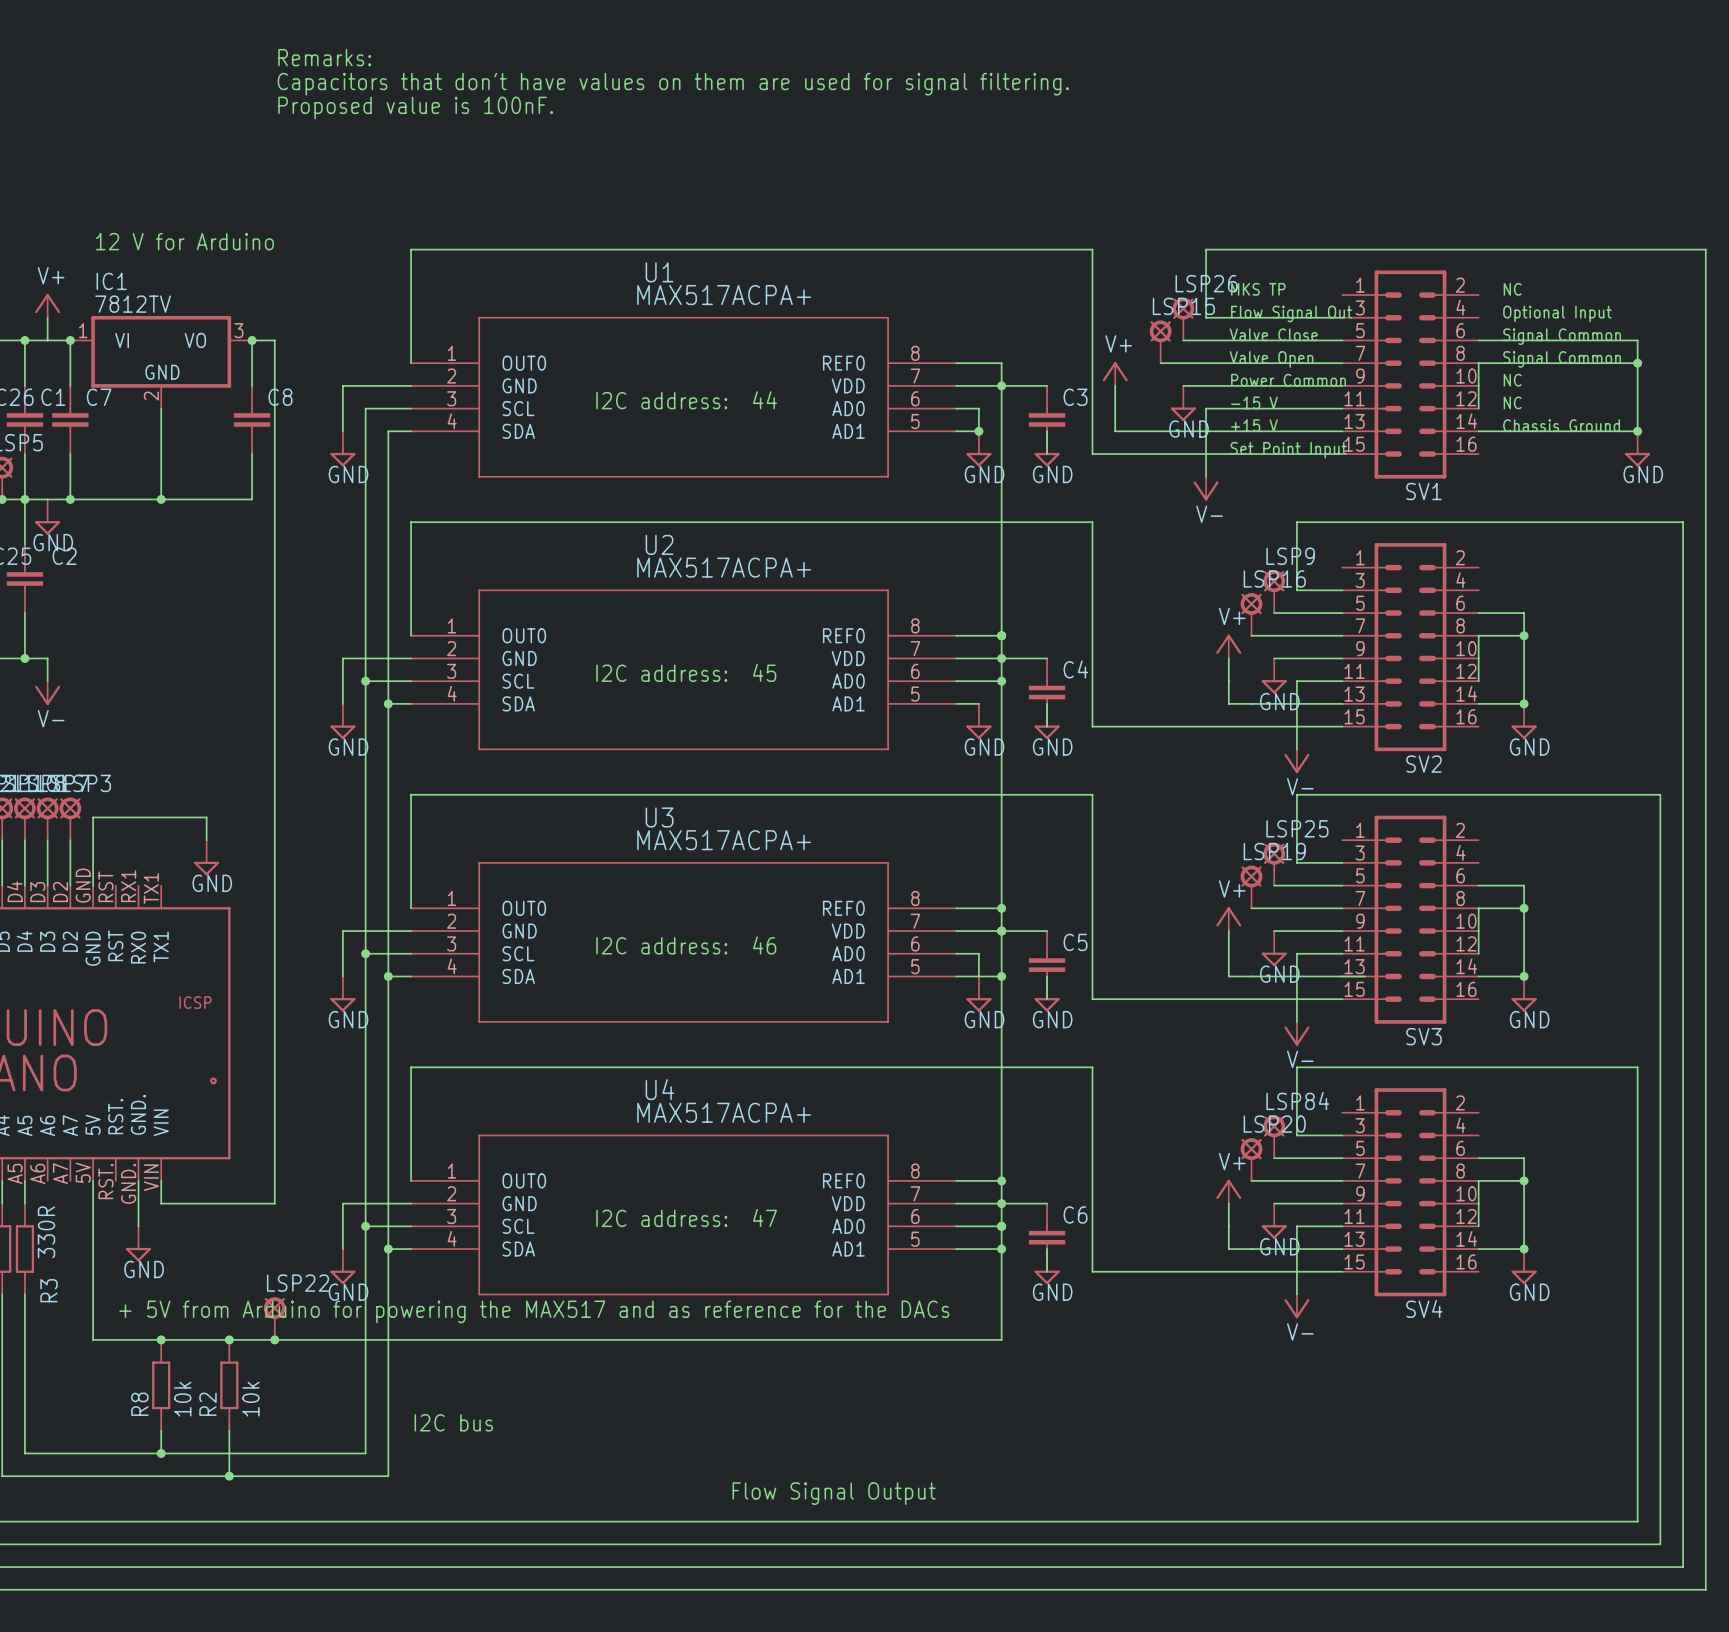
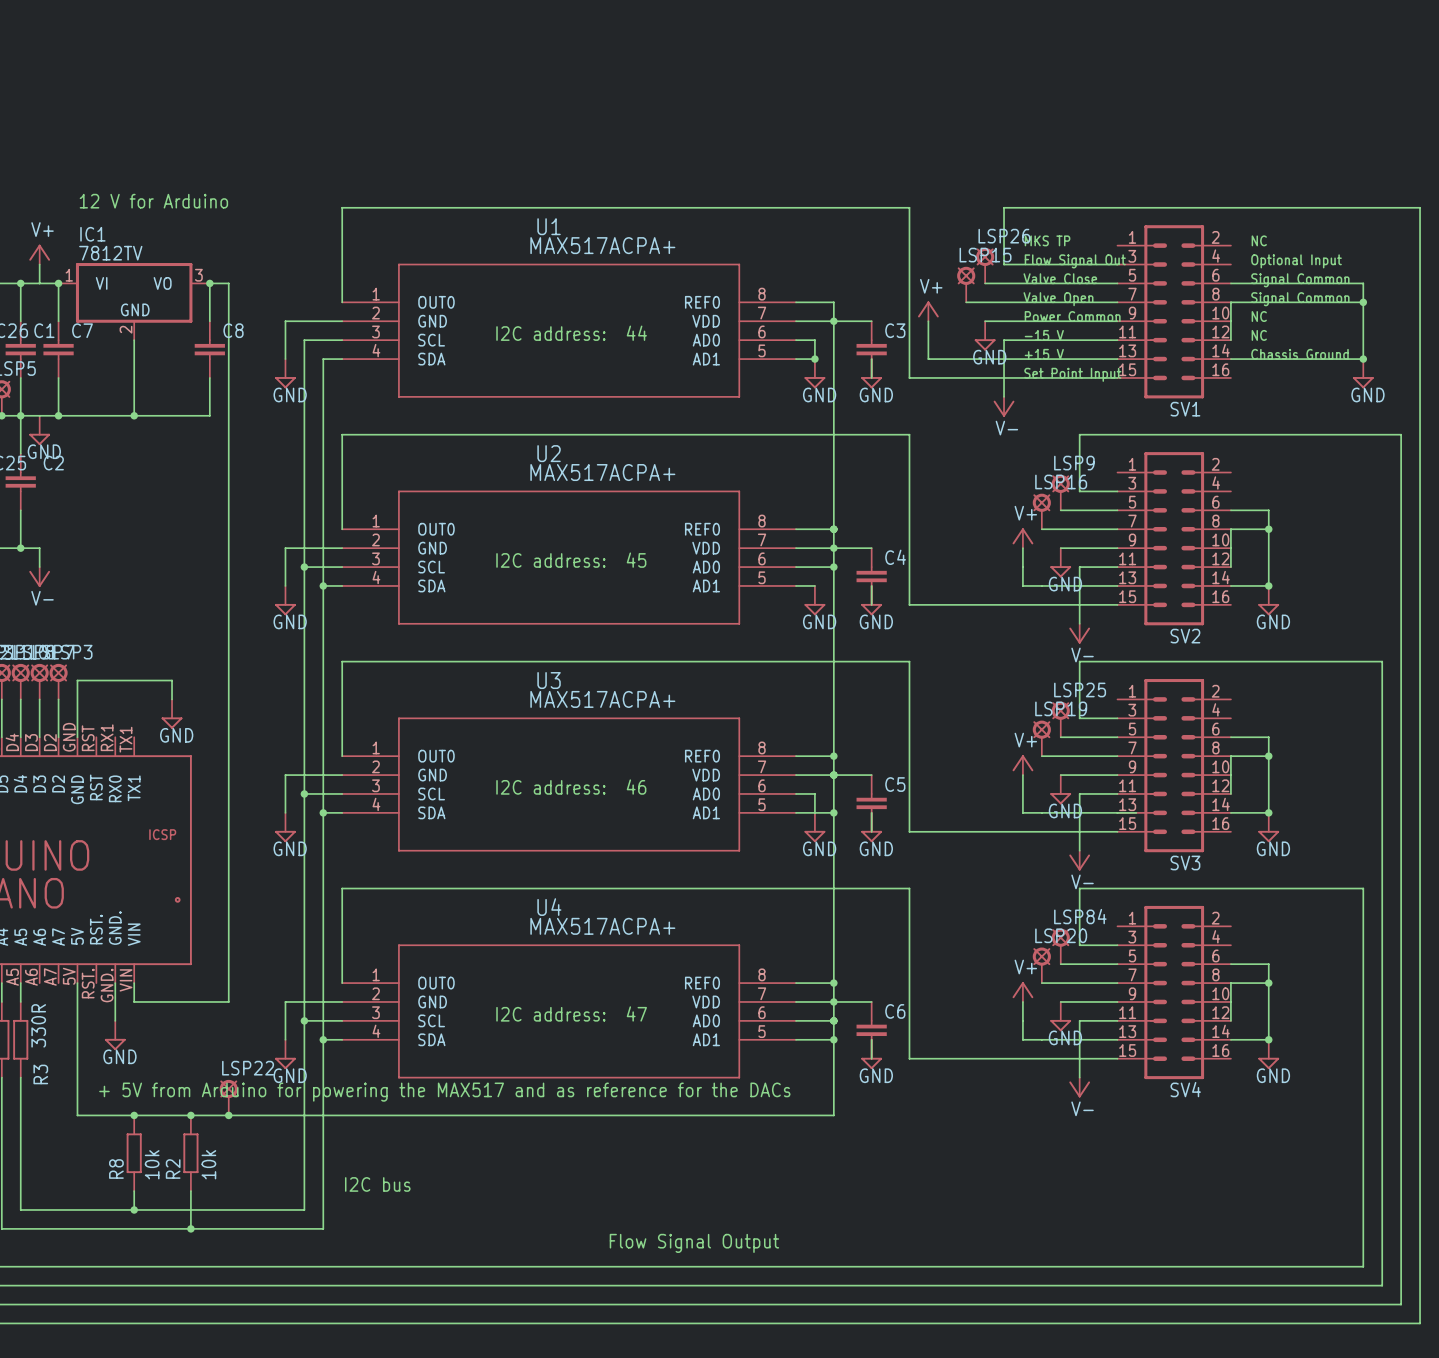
text: Remarks: (324, 57) -> none
text: Capacitors that don't have values on them are used for signal filtering. (673, 84) -> none
text: Proposed value is 100nF. (415, 108) -> none

